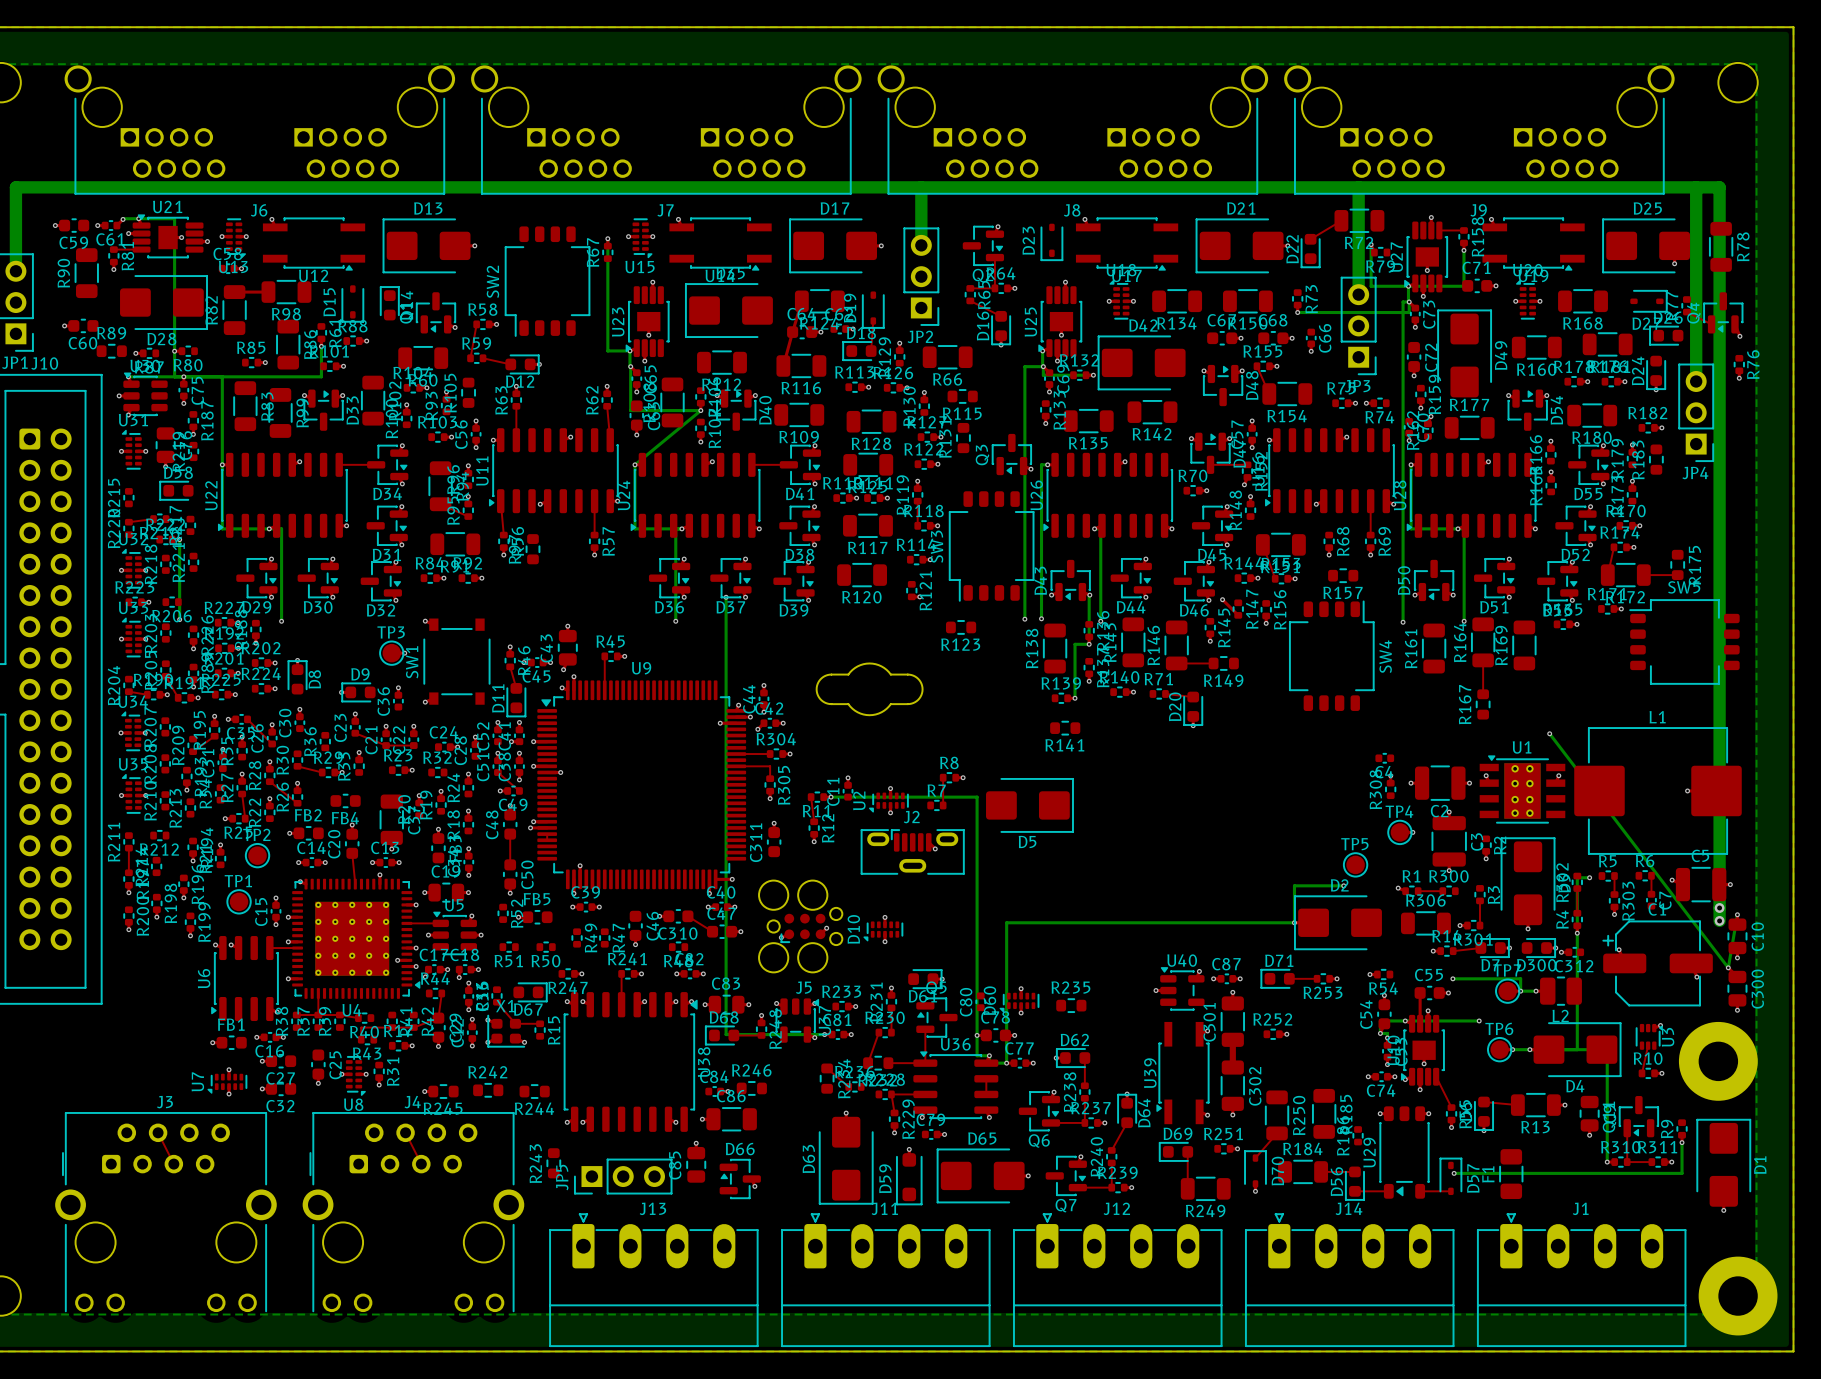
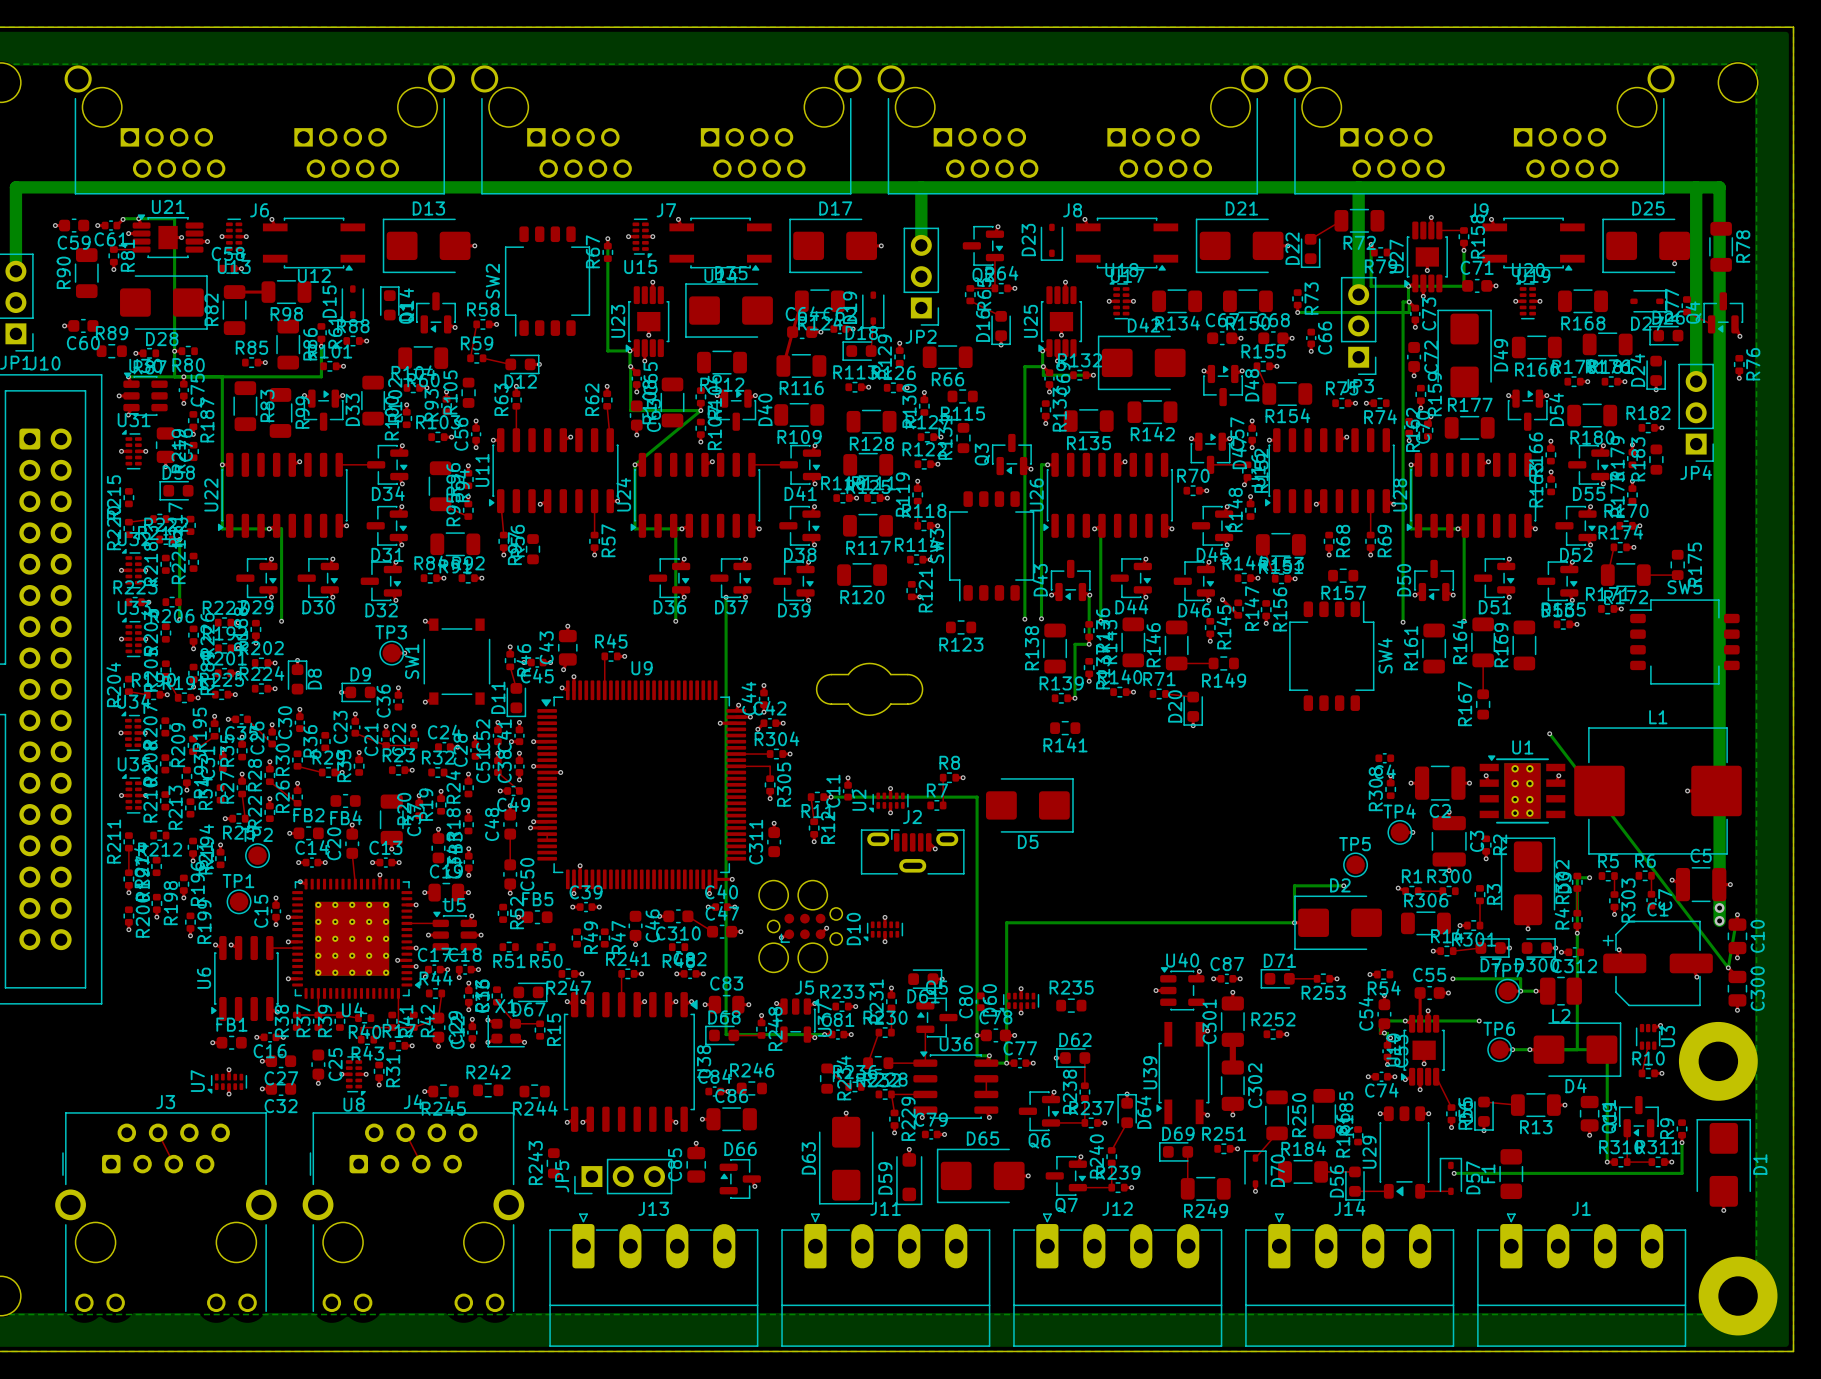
top track: none -> (398, 993) (398, 1027)
via: (1380, 1033) -> none
via: none -> (1384, 1033)
via: (1387, 1037) -> none
via: none -> (1390, 1037)

